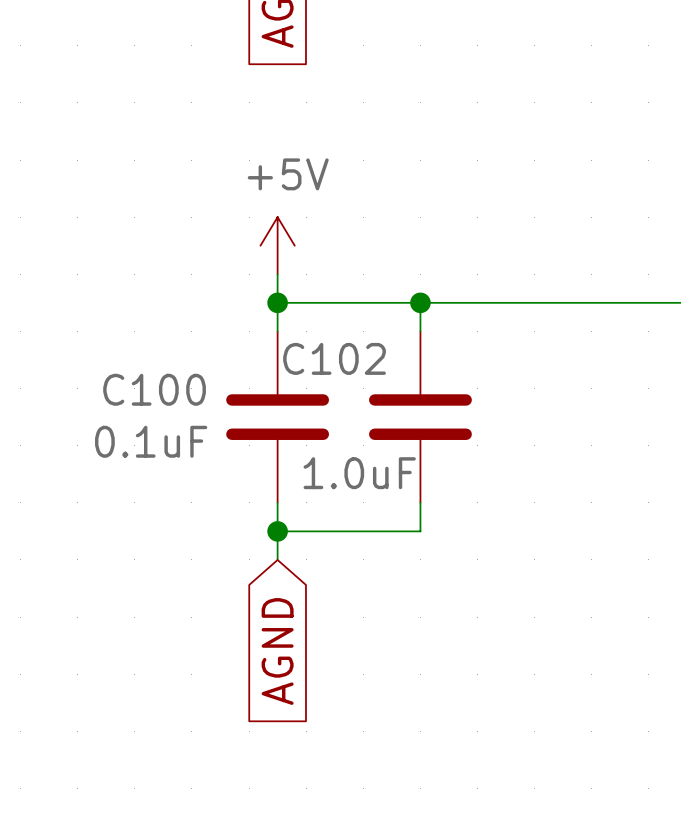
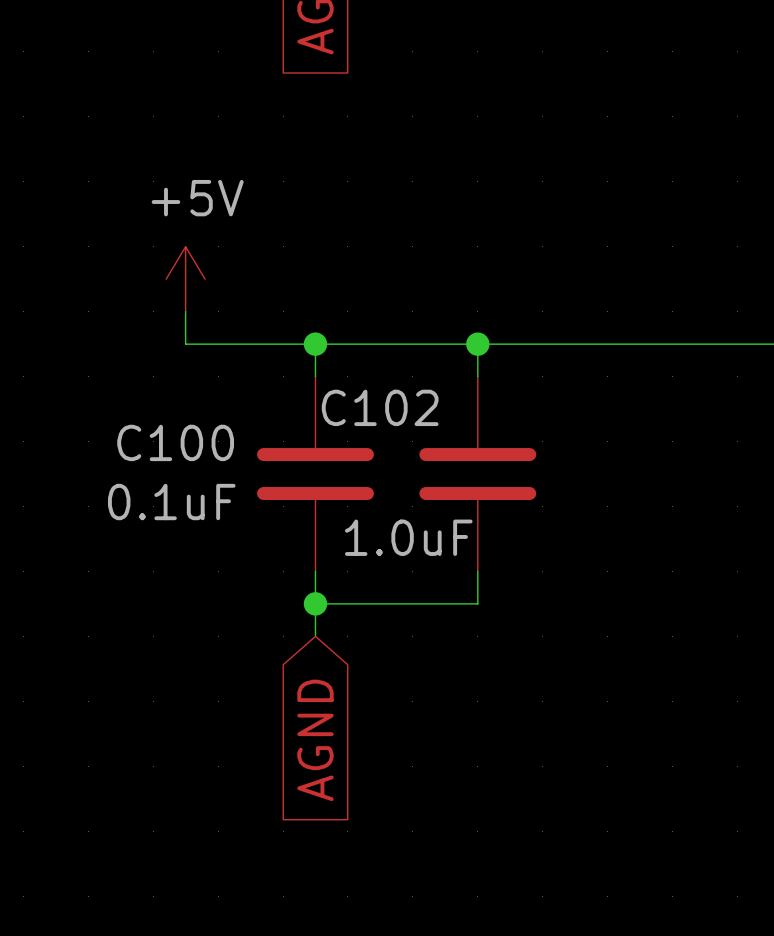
power symbol position: +5V (277, 245) -> +5V (185, 279)
wire: (277, 274) (277, 302) -> (185, 311) (185, 344) (315, 344)

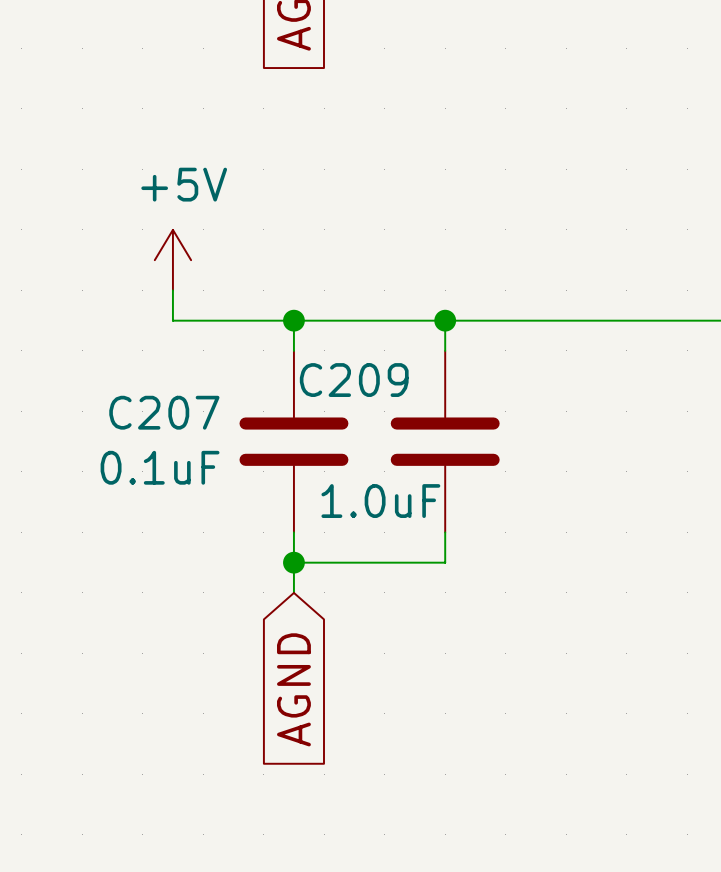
C102 name: C102 (380, 407) -> C209 (354, 380)
C100 name: C100 (175, 442) -> C207 (164, 412)

